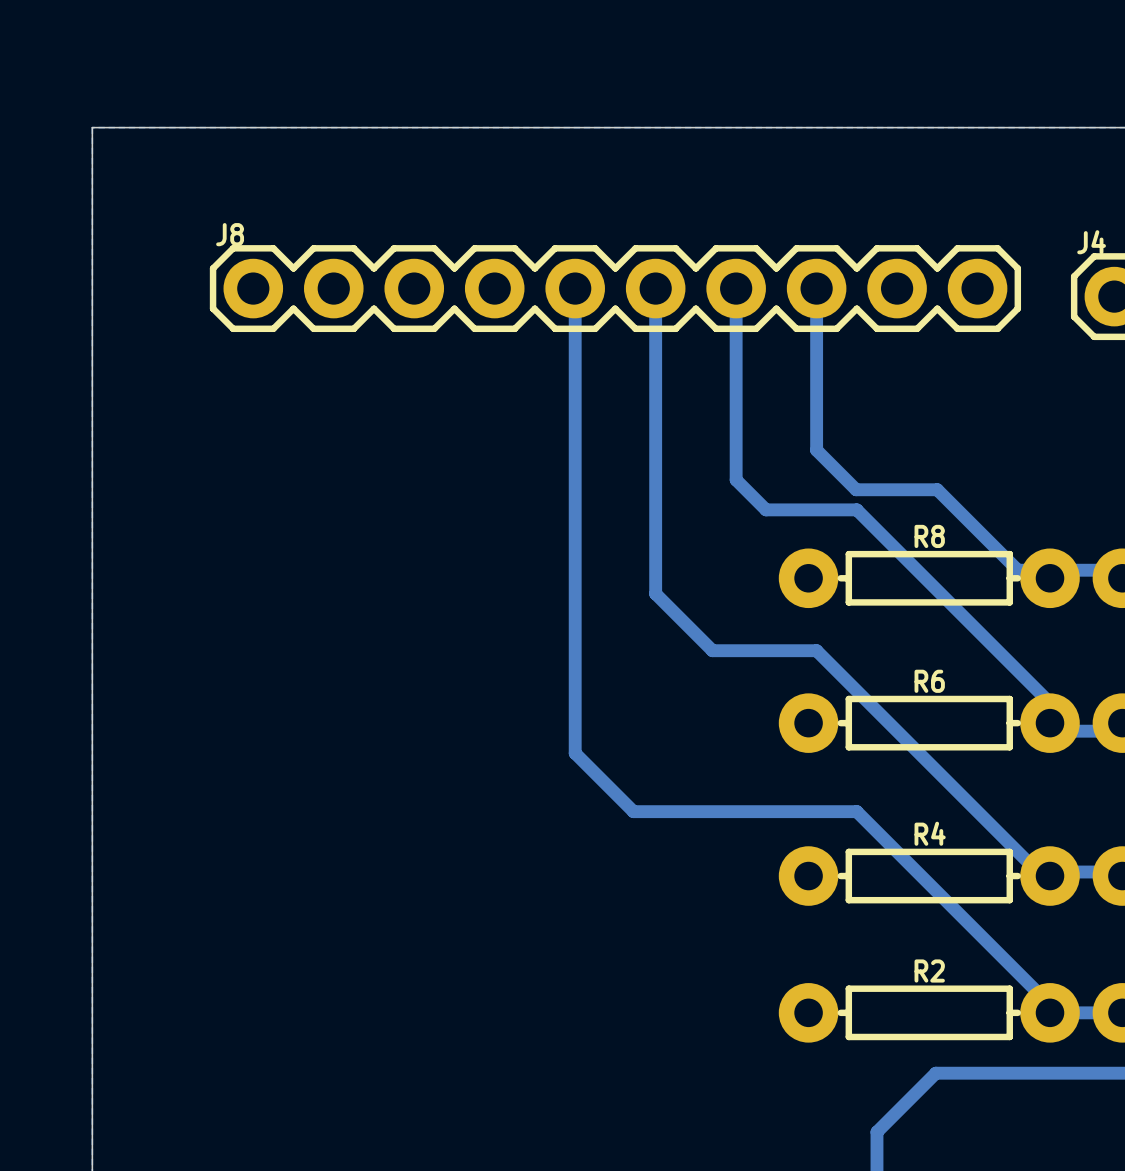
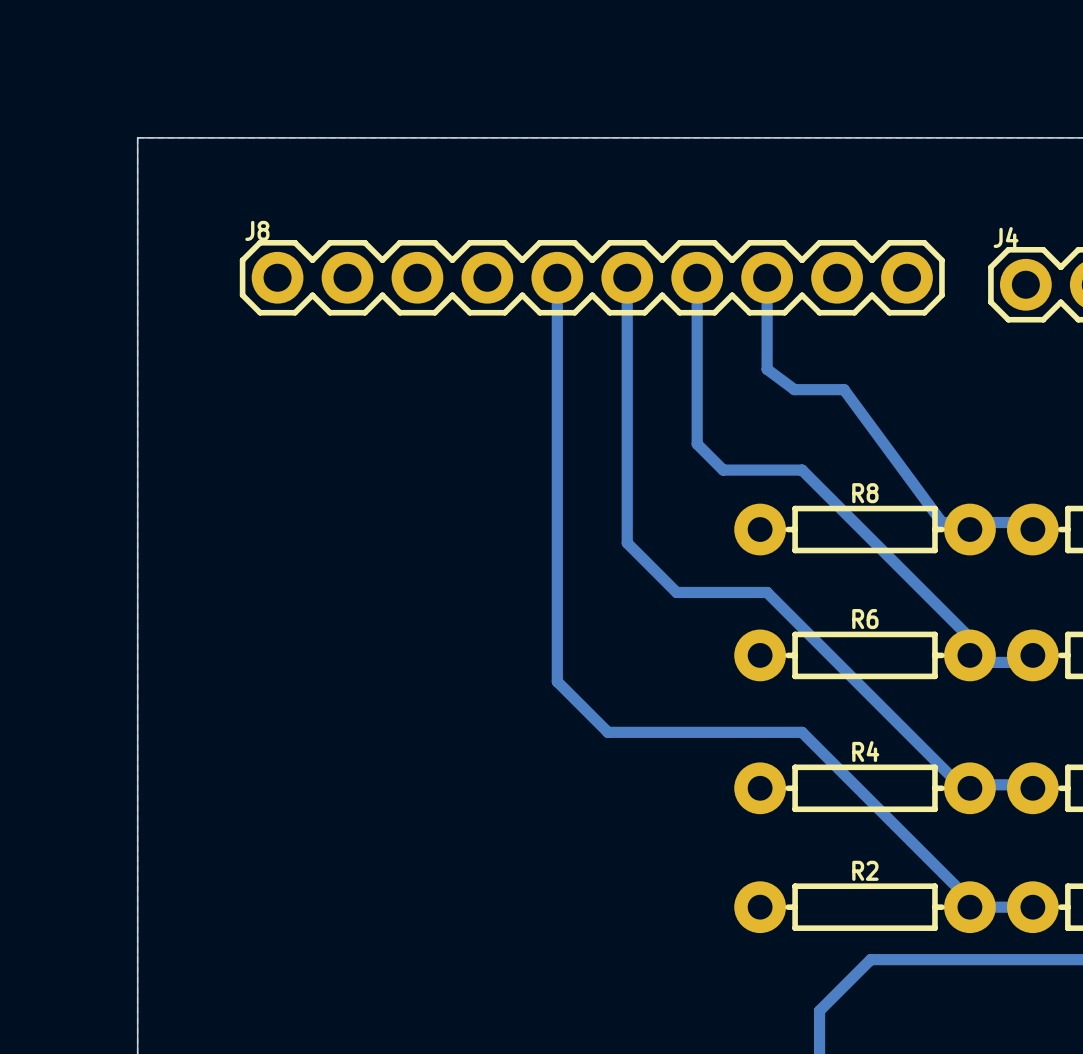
bottom track: (816, 393) (816, 450) (856, 489) (937, 489) (1017, 570) -> (767, 369) (794, 389) (844, 389) (941, 522)

